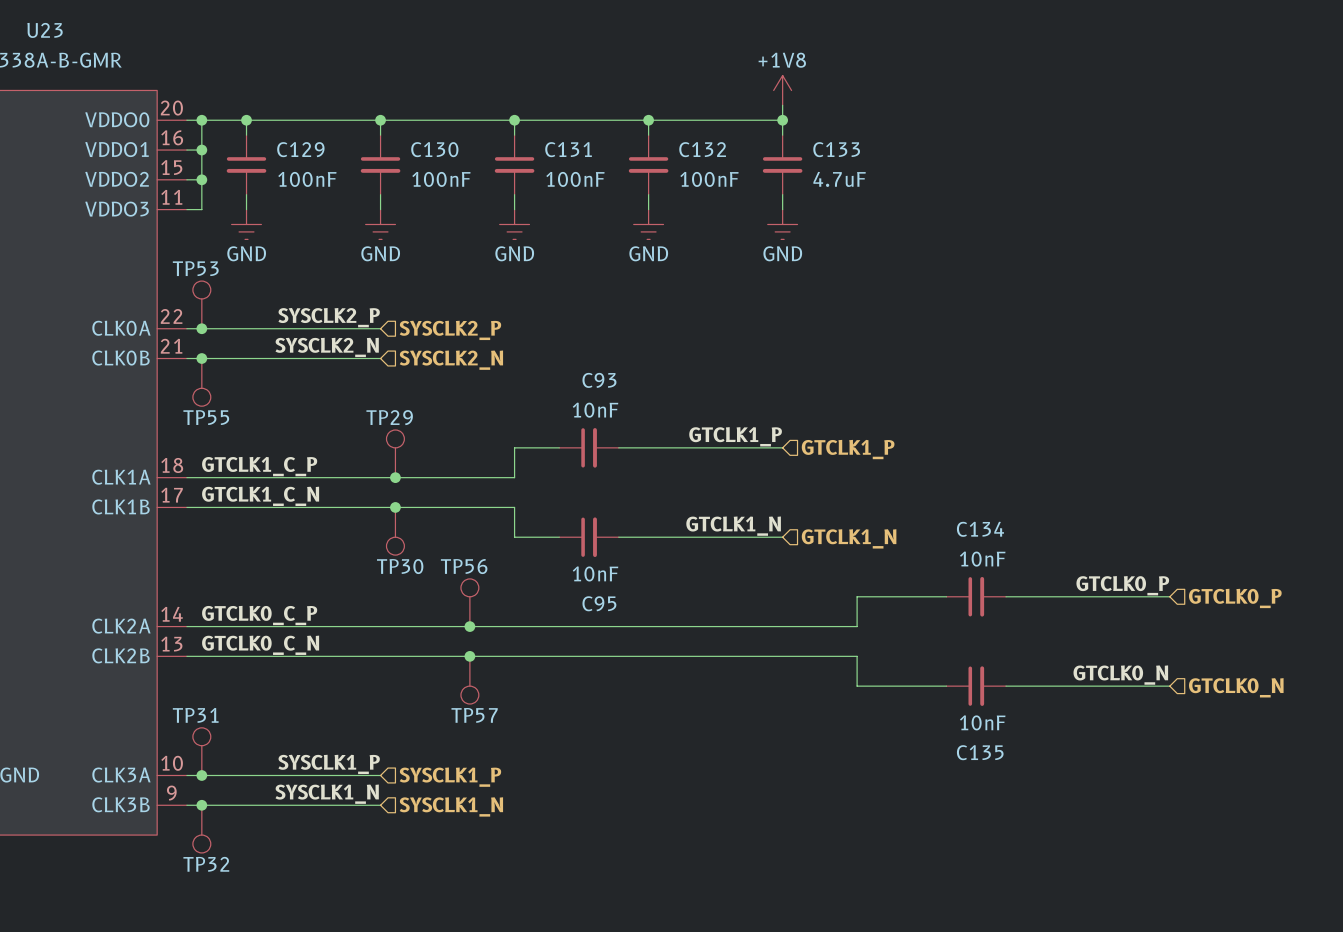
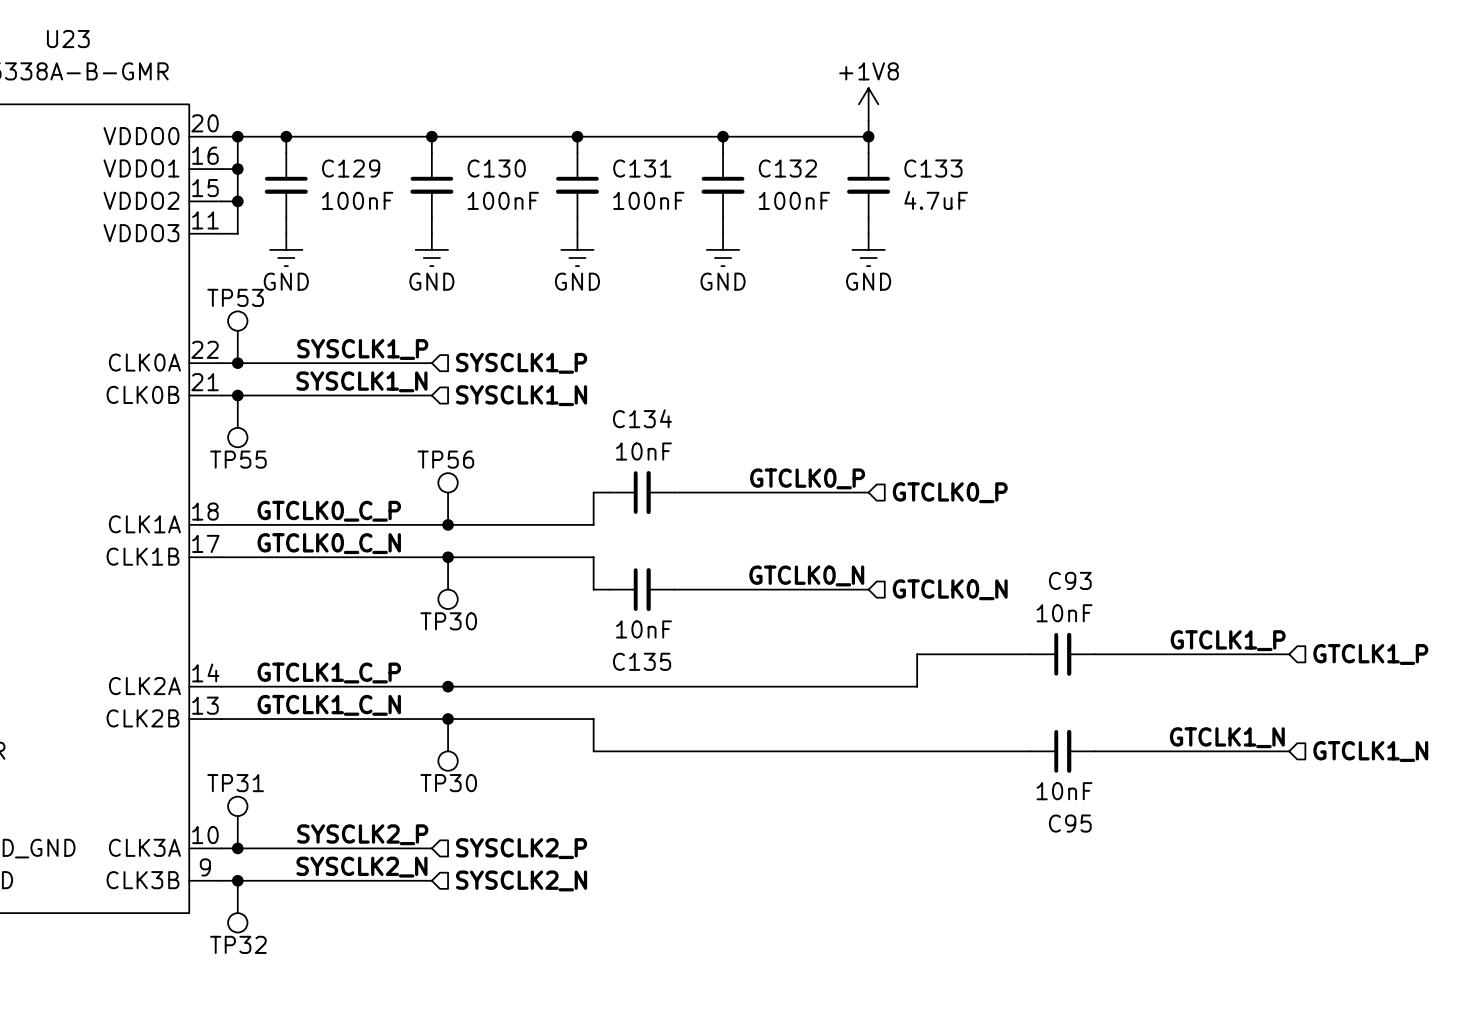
label: SYSCLK2_P (329, 317) -> SYSCLK1_P (362, 349)
hierarchical label: SYSCLK2_P (450, 330) -> SYSCLK1_P (521, 363)
label: SYSCLK2_N (327, 347) -> SYSCLK1_N (361, 381)
hierarchical label: SYSCLK2_N (451, 360) -> SYSCLK1_N (521, 395)
TP29 name: TP29 (389, 417) -> TP56 (445, 459)
label: GTCLK1_P (735, 436) -> GTCLK0_P (807, 478)
wire: (529, 447) (514, 447) (514, 477) -> (593, 492) (593, 524) (577, 524)
C93 position: (589, 447) -> (1062, 654)
hierarchical label: GTCLK1_P (848, 449) -> GTCLK0_P (950, 492)
label position: GTCLK1_C_P (259, 466) -> GTCLK1_C_P (329, 673)
label position: GTCLK1_C_N (260, 496) -> GTCLK1_C_N (329, 705)
wire: (514, 507) (514, 537) (529, 537) -> (577, 557) (593, 557) (593, 589)
label: GTCLK1_N (733, 526) -> GTCLK0_N (806, 575)
C95 position: (589, 537) -> (1062, 751)
hierarchical label: GTCLK1_N (849, 538) -> GTCLK0_N (950, 589)
label: GTCLK0_P (1122, 585) -> GTCLK1_P (1228, 640)
wire: (857, 596) (857, 626) (827, 626) -> (949, 654) (917, 654) (917, 686)
C134 position: (976, 596) -> (642, 492)
hierarchical label: GTCLK0_P (1235, 598) -> GTCLK1_P (1370, 654)
TP56: (469, 602) -> none
label position: GTCLK0_C_P (259, 615) -> GTCLK0_C_P (329, 511)
junction: none -> (448, 686)
junction: (469, 626) -> none
label position: GTCLK0_C_N (260, 645) -> GTCLK0_C_N (329, 543)
junction: none -> (448, 719)
junction: (469, 656) -> none
wire: (529, 656) (857, 656) (857, 686) -> (593, 719) (593, 751) (949, 751)
label: GTCLK0_N (1120, 675) -> GTCLK1_N (1227, 737)
TP30: none -> (448, 744)
TP57: (469, 680) -> none
C135 position: (976, 686) -> (642, 589)
hierarchical label: GTCLK0_N (1236, 687) -> GTCLK1_N (1370, 751)
label: SYSCLK1_P (329, 764) -> SYSCLK2_P (362, 834)
hierarchical label: SYSCLK1_P (450, 777) -> SYSCLK2_P (521, 848)
label: SYSCLK1_N (327, 794) -> SYSCLK2_N (361, 867)
hierarchical label: SYSCLK1_N (451, 806) -> SYSCLK2_N (521, 880)

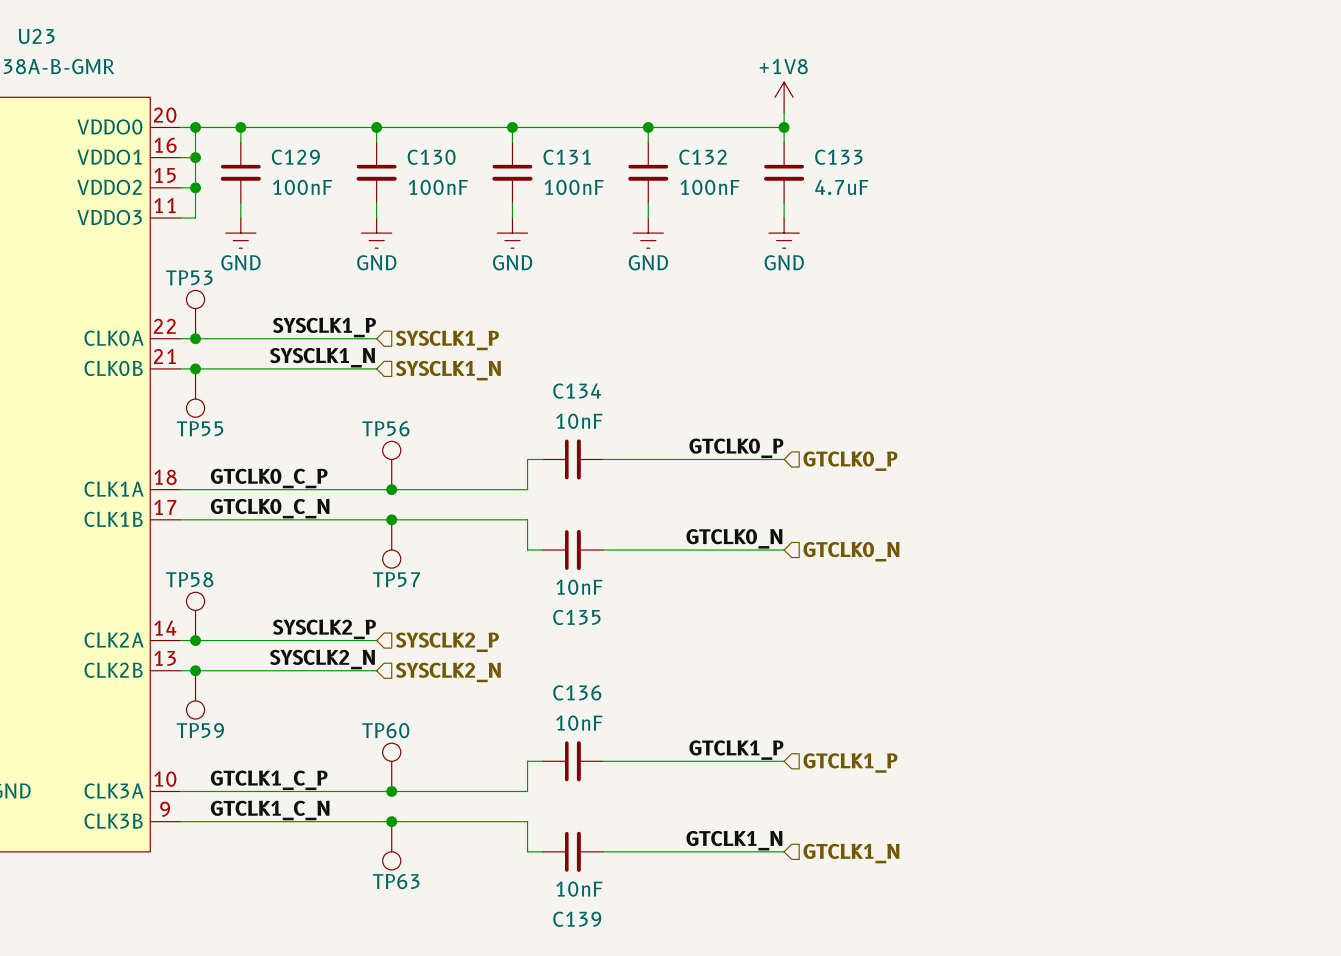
TP30 name: TP30 (448, 621) -> TP57 (396, 579)
label: GTCLK1_P (1228, 640) -> none
wire: (1030, 654) (917, 654) (917, 686) (431, 686) -> none
C93: 10nF (1062, 654) -> none
wire: (1095, 654) (1289, 654) -> none
hierarchical label: GTCLK1_P (1370, 654) -> none
TP58: none -> (195, 616)
label position: GTCLK1_C_P (329, 673) -> GTCLK1_C_P (269, 780)
junction: none -> (195, 640)
junction: (448, 686) -> none
label position: GTCLK1_C_N (329, 705) -> GTCLK1_C_N (270, 810)
junction: none -> (195, 670)
wire: (431, 719) (593, 719) (593, 751) (1030, 751) -> none
junction: (448, 719) -> none
label: GTCLK1_N (1227, 737) -> none
TP59: none -> (195, 694)
TP30: (448, 744) -> none
C95: 10nF (1062, 751) -> none
wire: (1095, 751) (1289, 751) -> none
hierarchical label: GTCLK1_N (1370, 751) -> none
label: none -> GTCLK1_P (736, 750)
wire: none -> (542, 761) (527, 761) (527, 791) (376, 791)
C136: none -> 10nF (572, 761)
wire: none -> (603, 761) (784, 761)
hierarchical label: none -> GTCLK1_P (850, 762)
TP31: (237, 822) -> none
TP60: none -> (391, 767)
label position: SYSCLK2_P (362, 834) -> SYSCLK2_P (324, 629)
junction: (237, 848) -> none
junction: none -> (391, 791)
hierarchical label position: SYSCLK2_P (521, 848) -> SYSCLK2_P (447, 642)
label position: SYSCLK2_N (361, 867) -> SYSCLK2_N (322, 659)
junction: (237, 880) -> none
wire: none -> (376, 821) (527, 821) (527, 851) (542, 851)
junction: none -> (391, 821)
hierarchical label position: SYSCLK2_N (521, 880) -> SYSCLK2_N (448, 672)
label: none -> GTCLK1_N (734, 840)
TP32: (237, 906) -> none
TP63: none -> (391, 845)
C139: none -> 10nF (572, 851)
wire: none -> (603, 851) (784, 851)
hierarchical label: none -> GTCLK1_N (851, 853)

